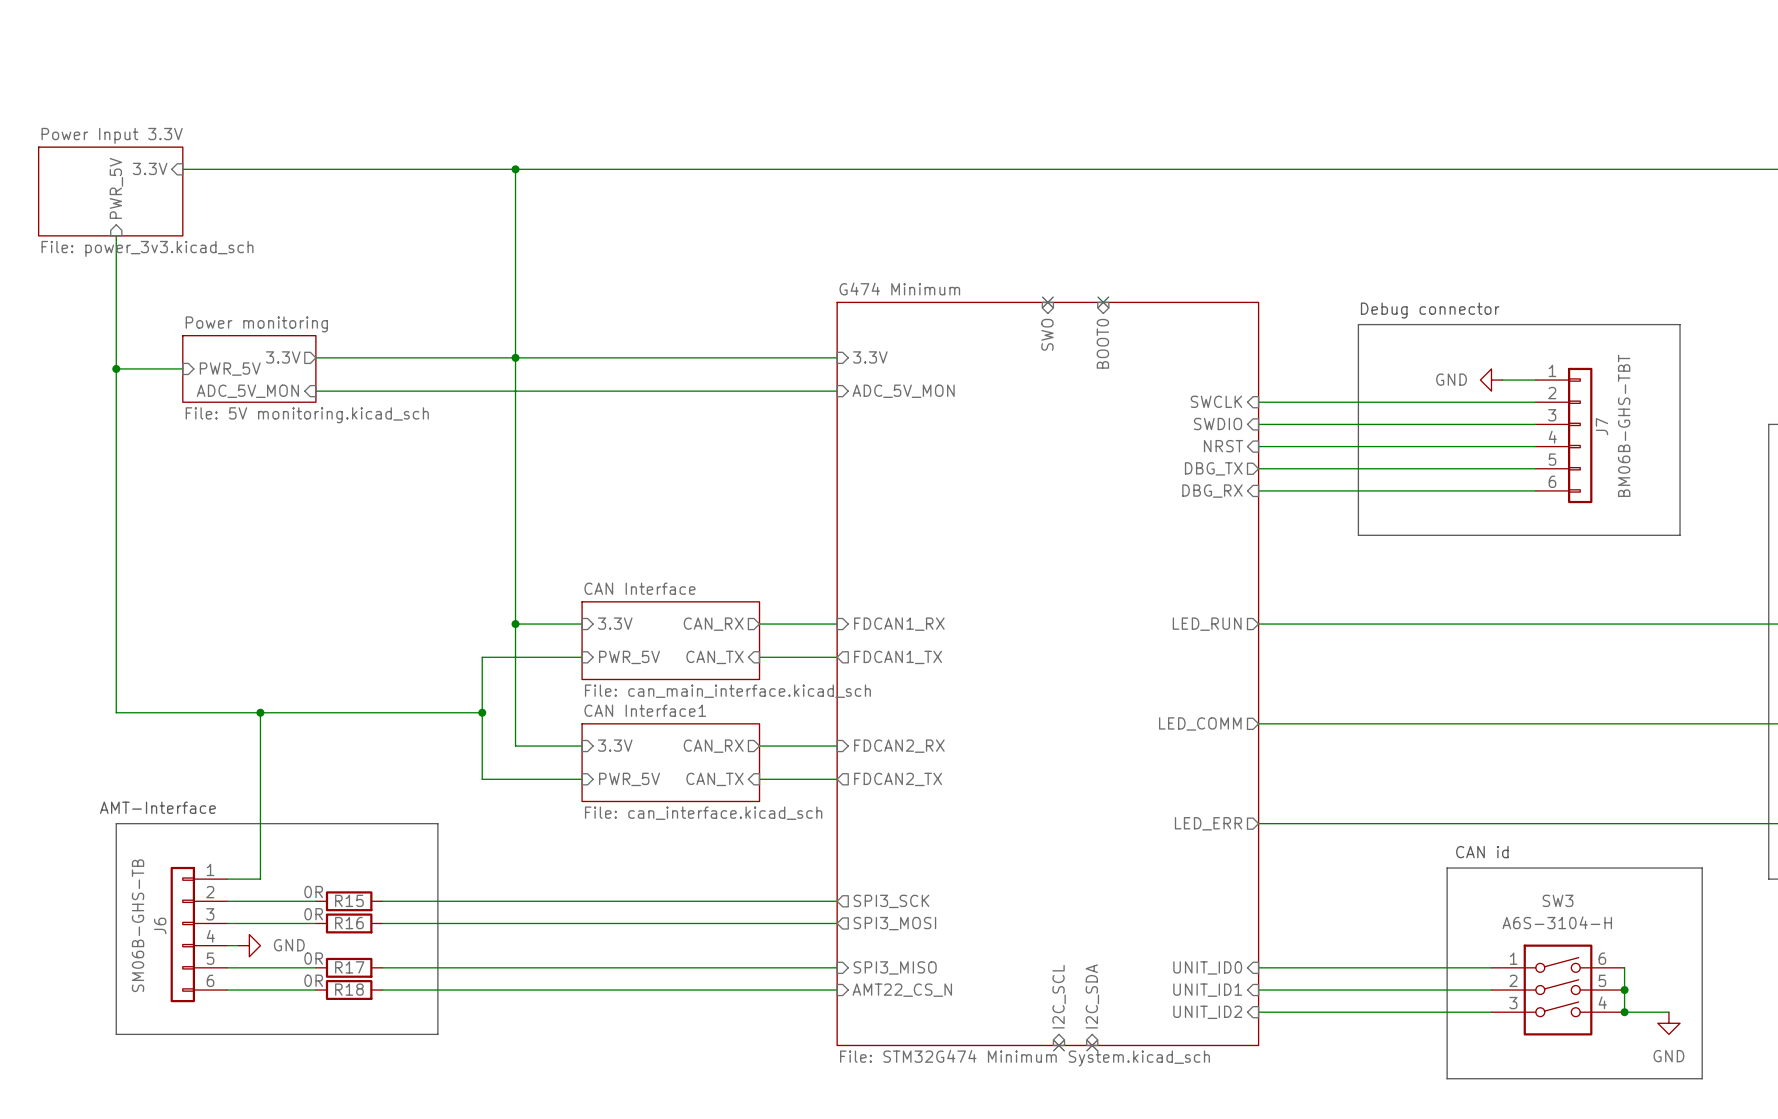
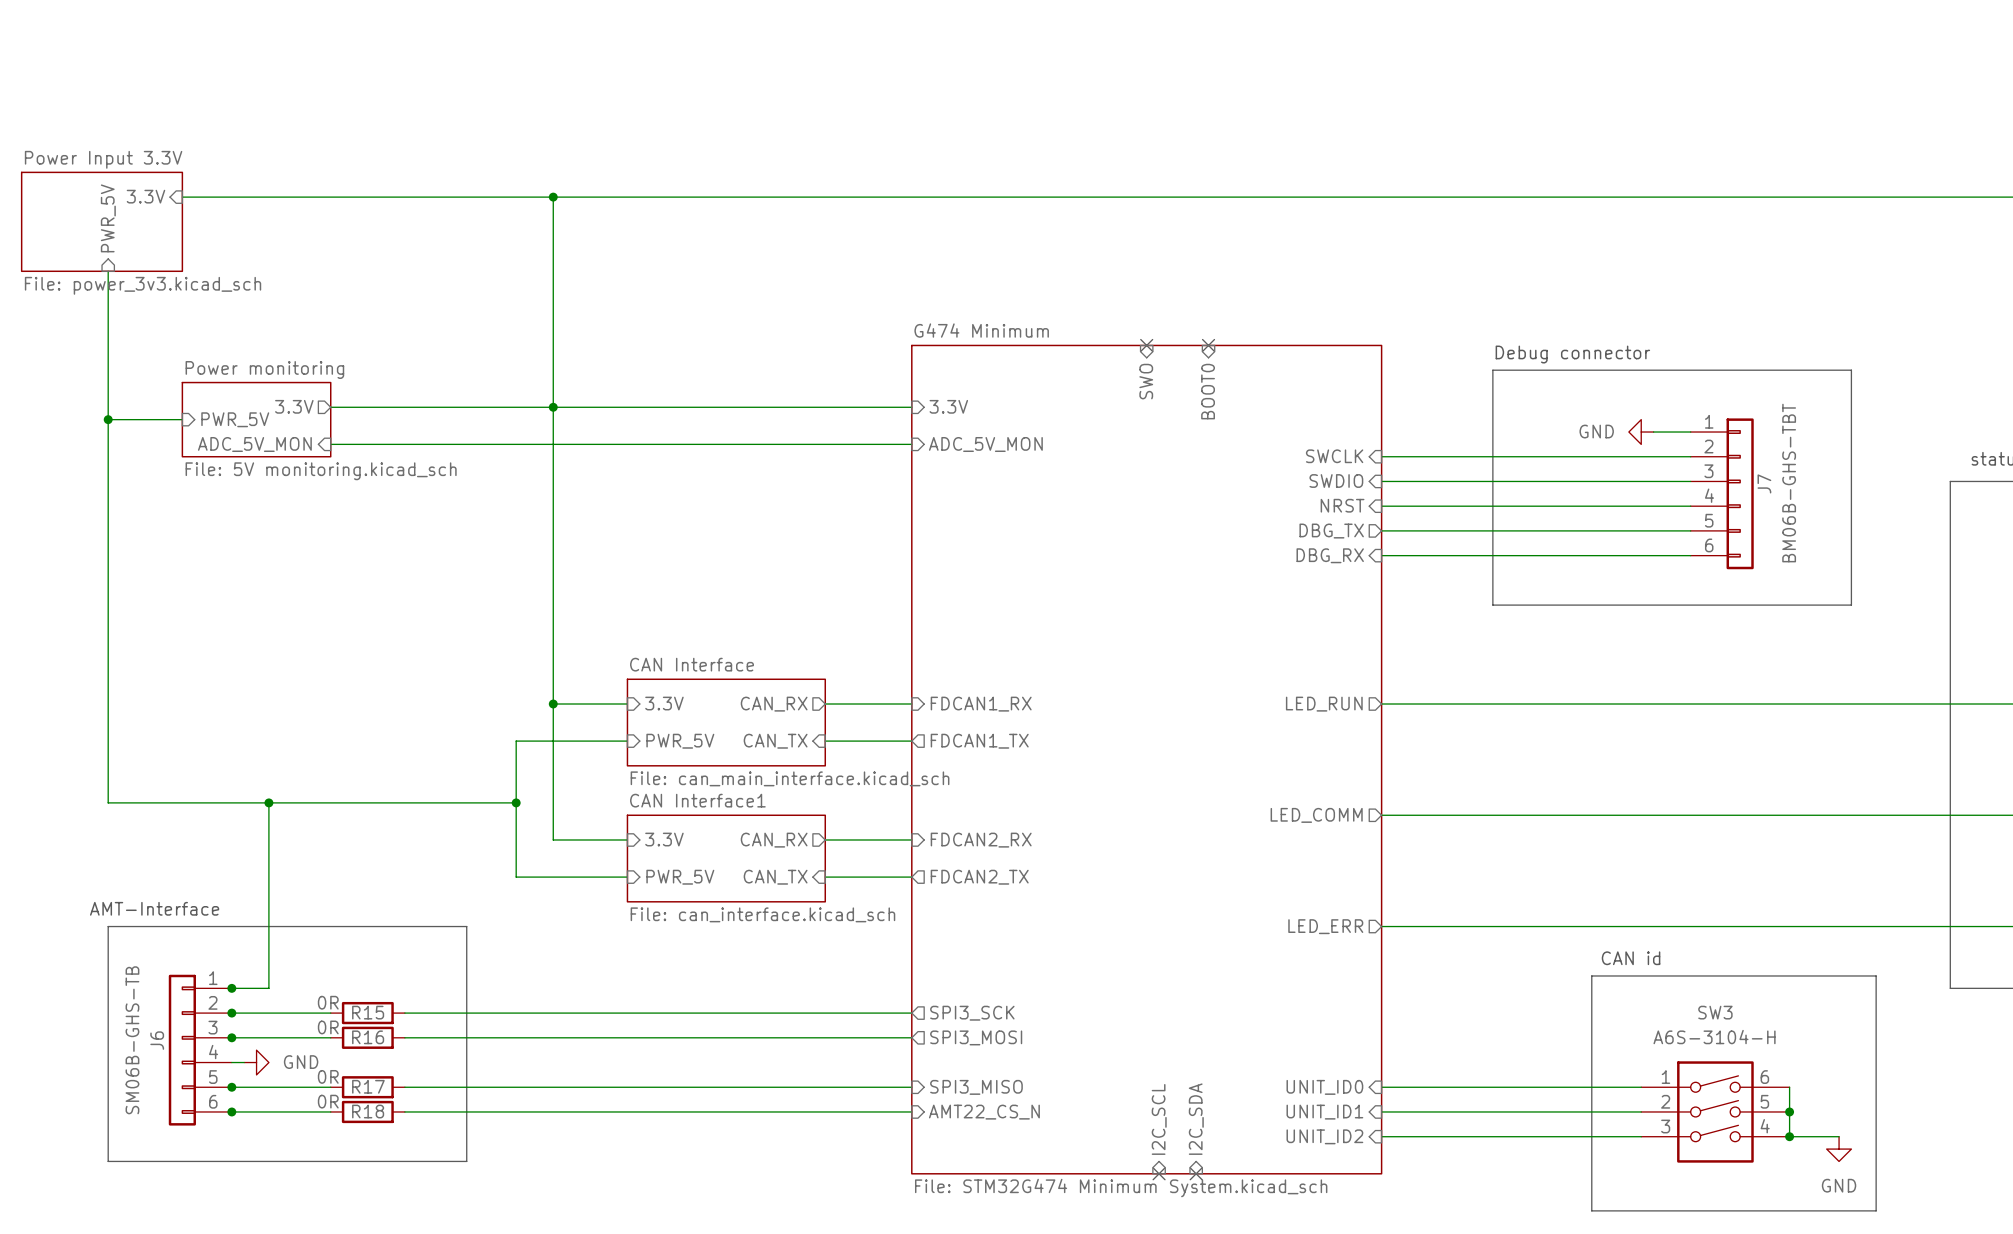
junction: none -> (231, 988)
junction: none -> (231, 1013)
junction: none -> (231, 1037)
junction: none -> (231, 1087)
junction: none -> (231, 1111)

